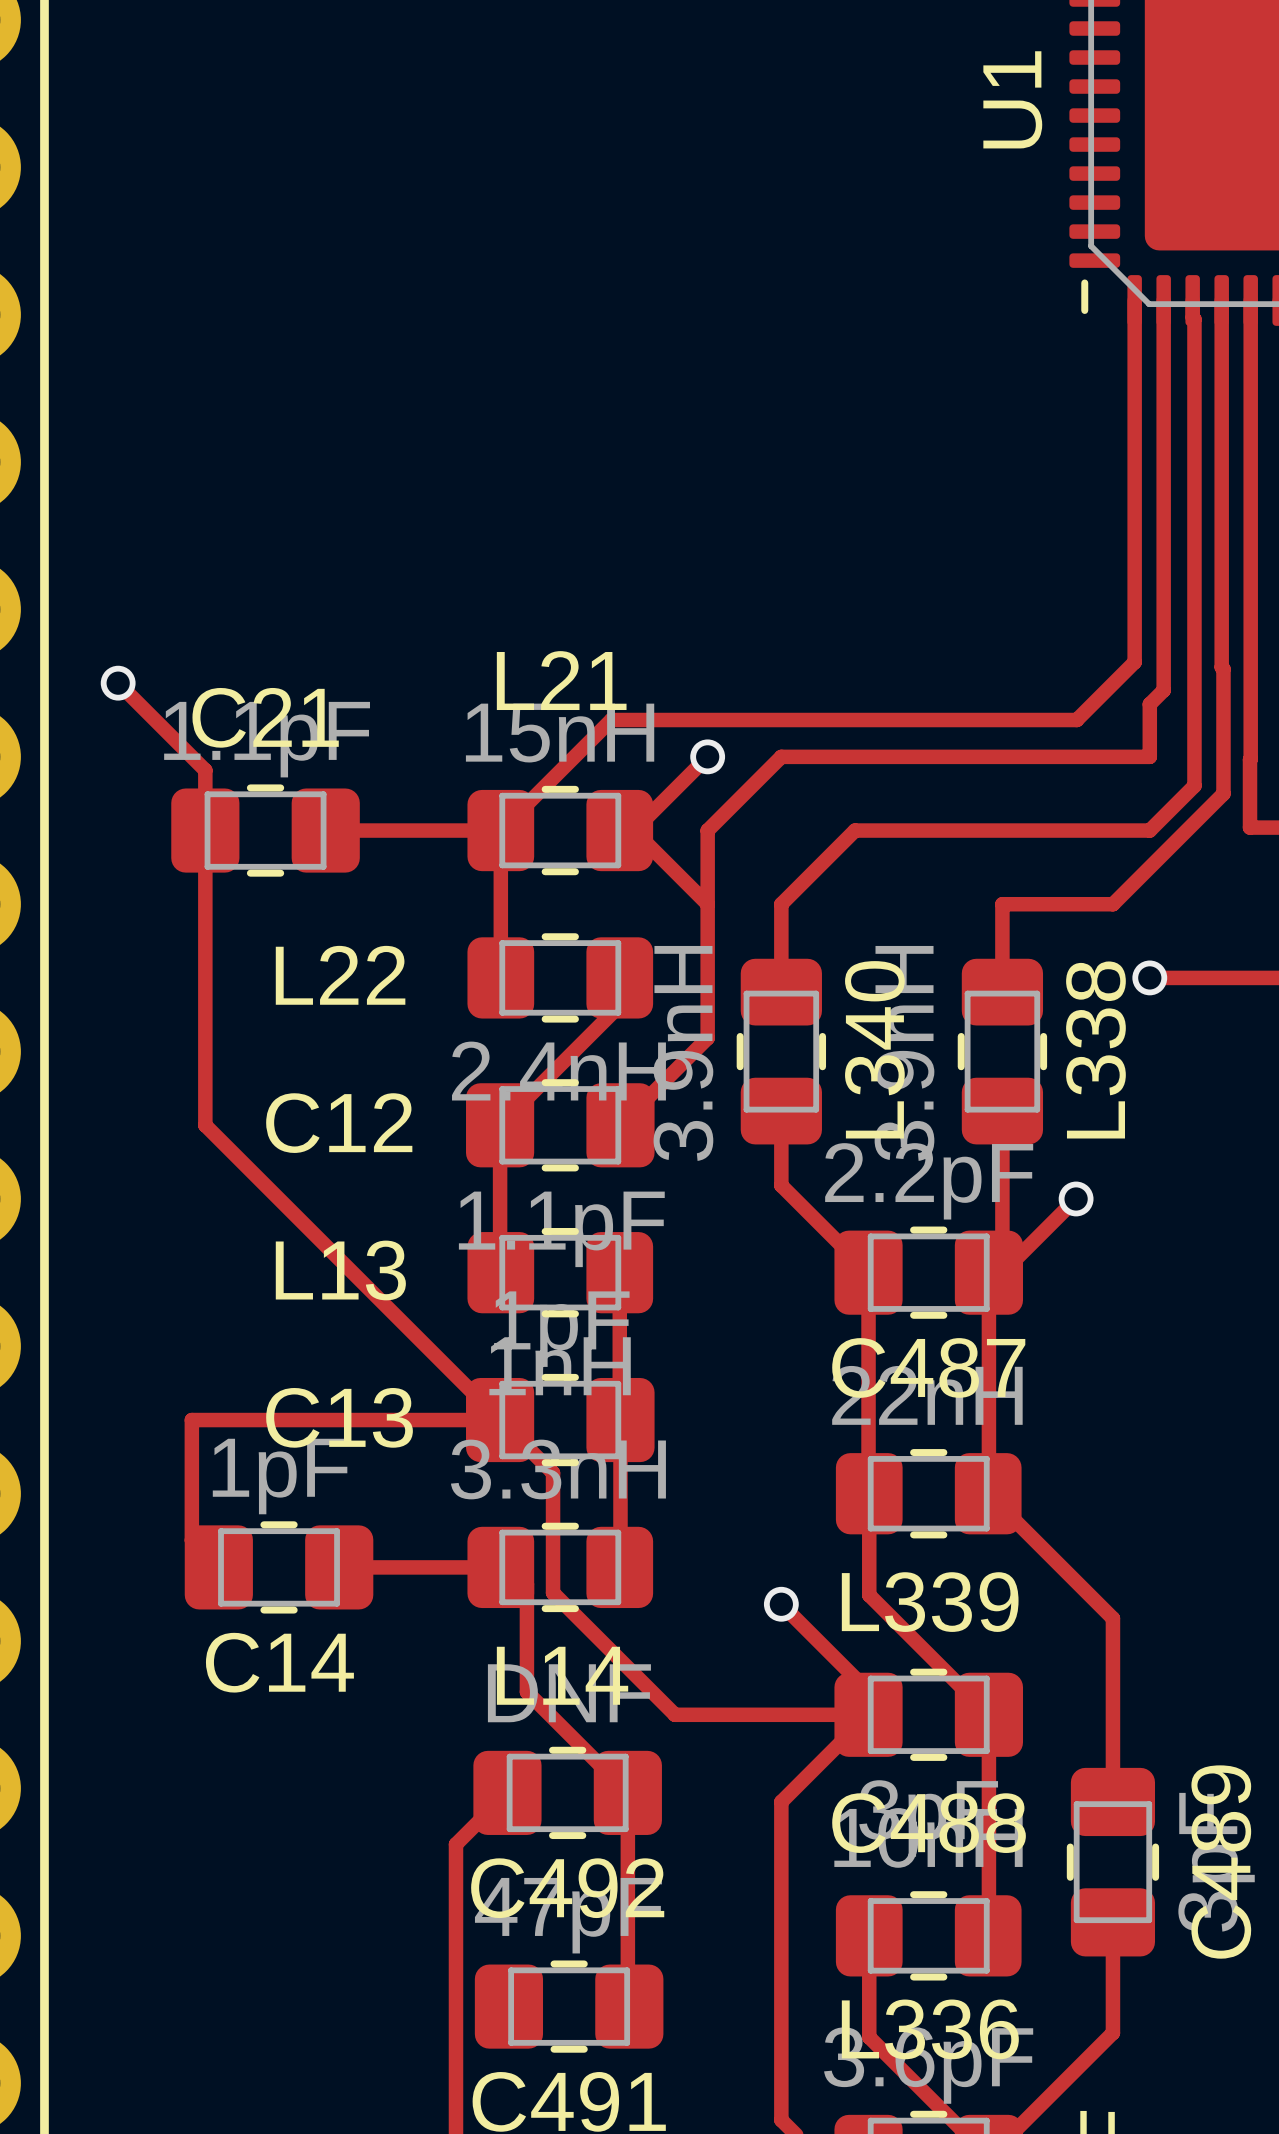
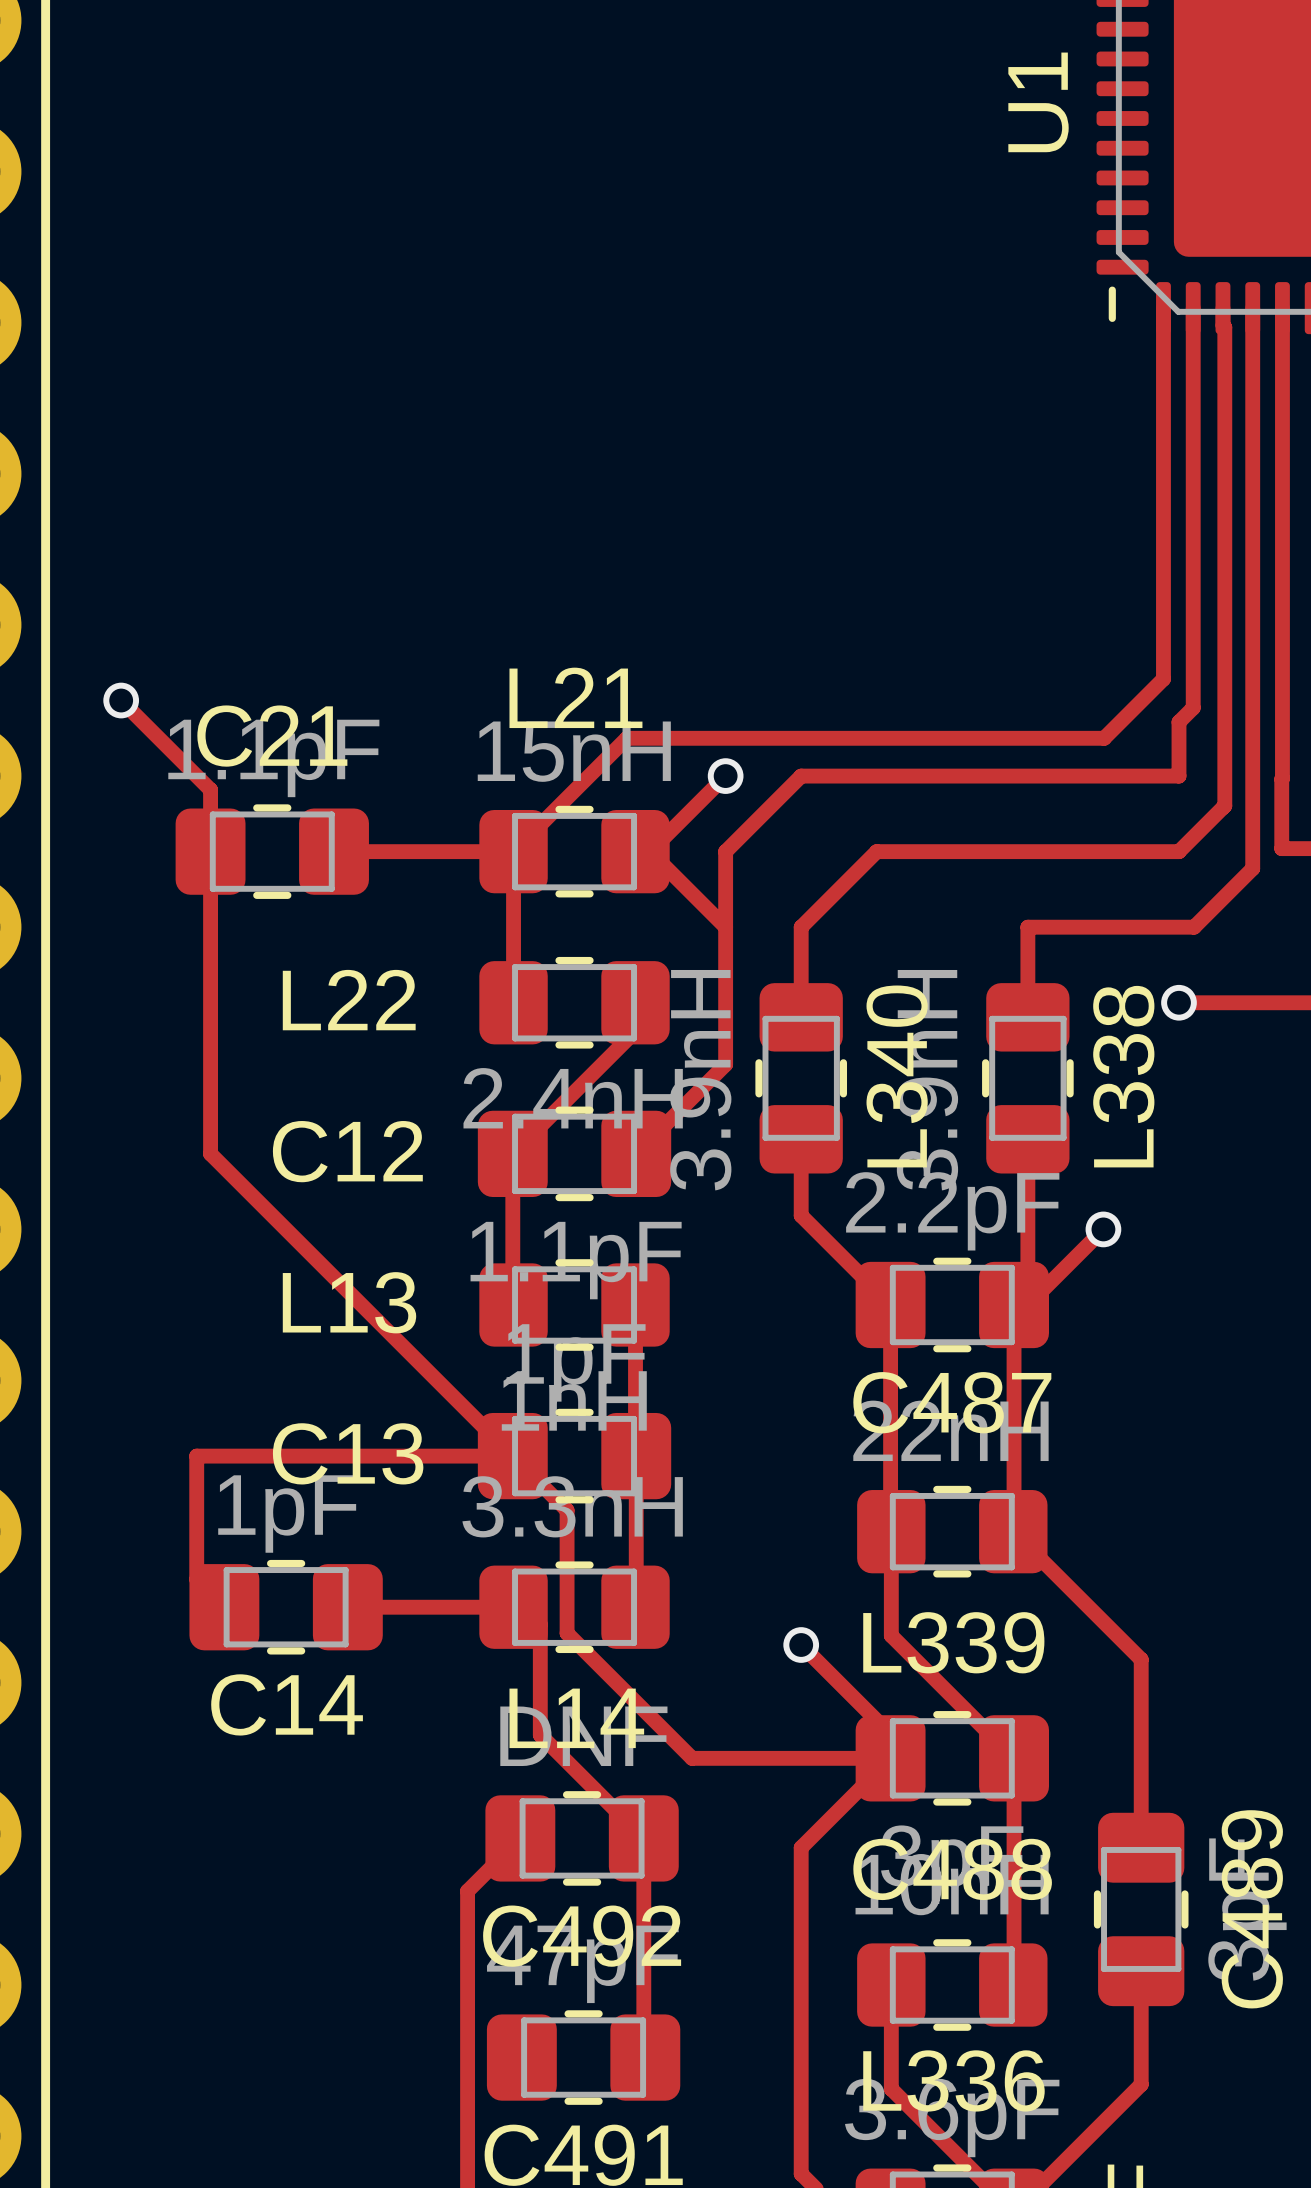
track: (1221, 667) (1223, 669) (1223, 793) (1113, 904) -> (1252, 684) (1252, 868) (1194, 927) (1141, 927)

